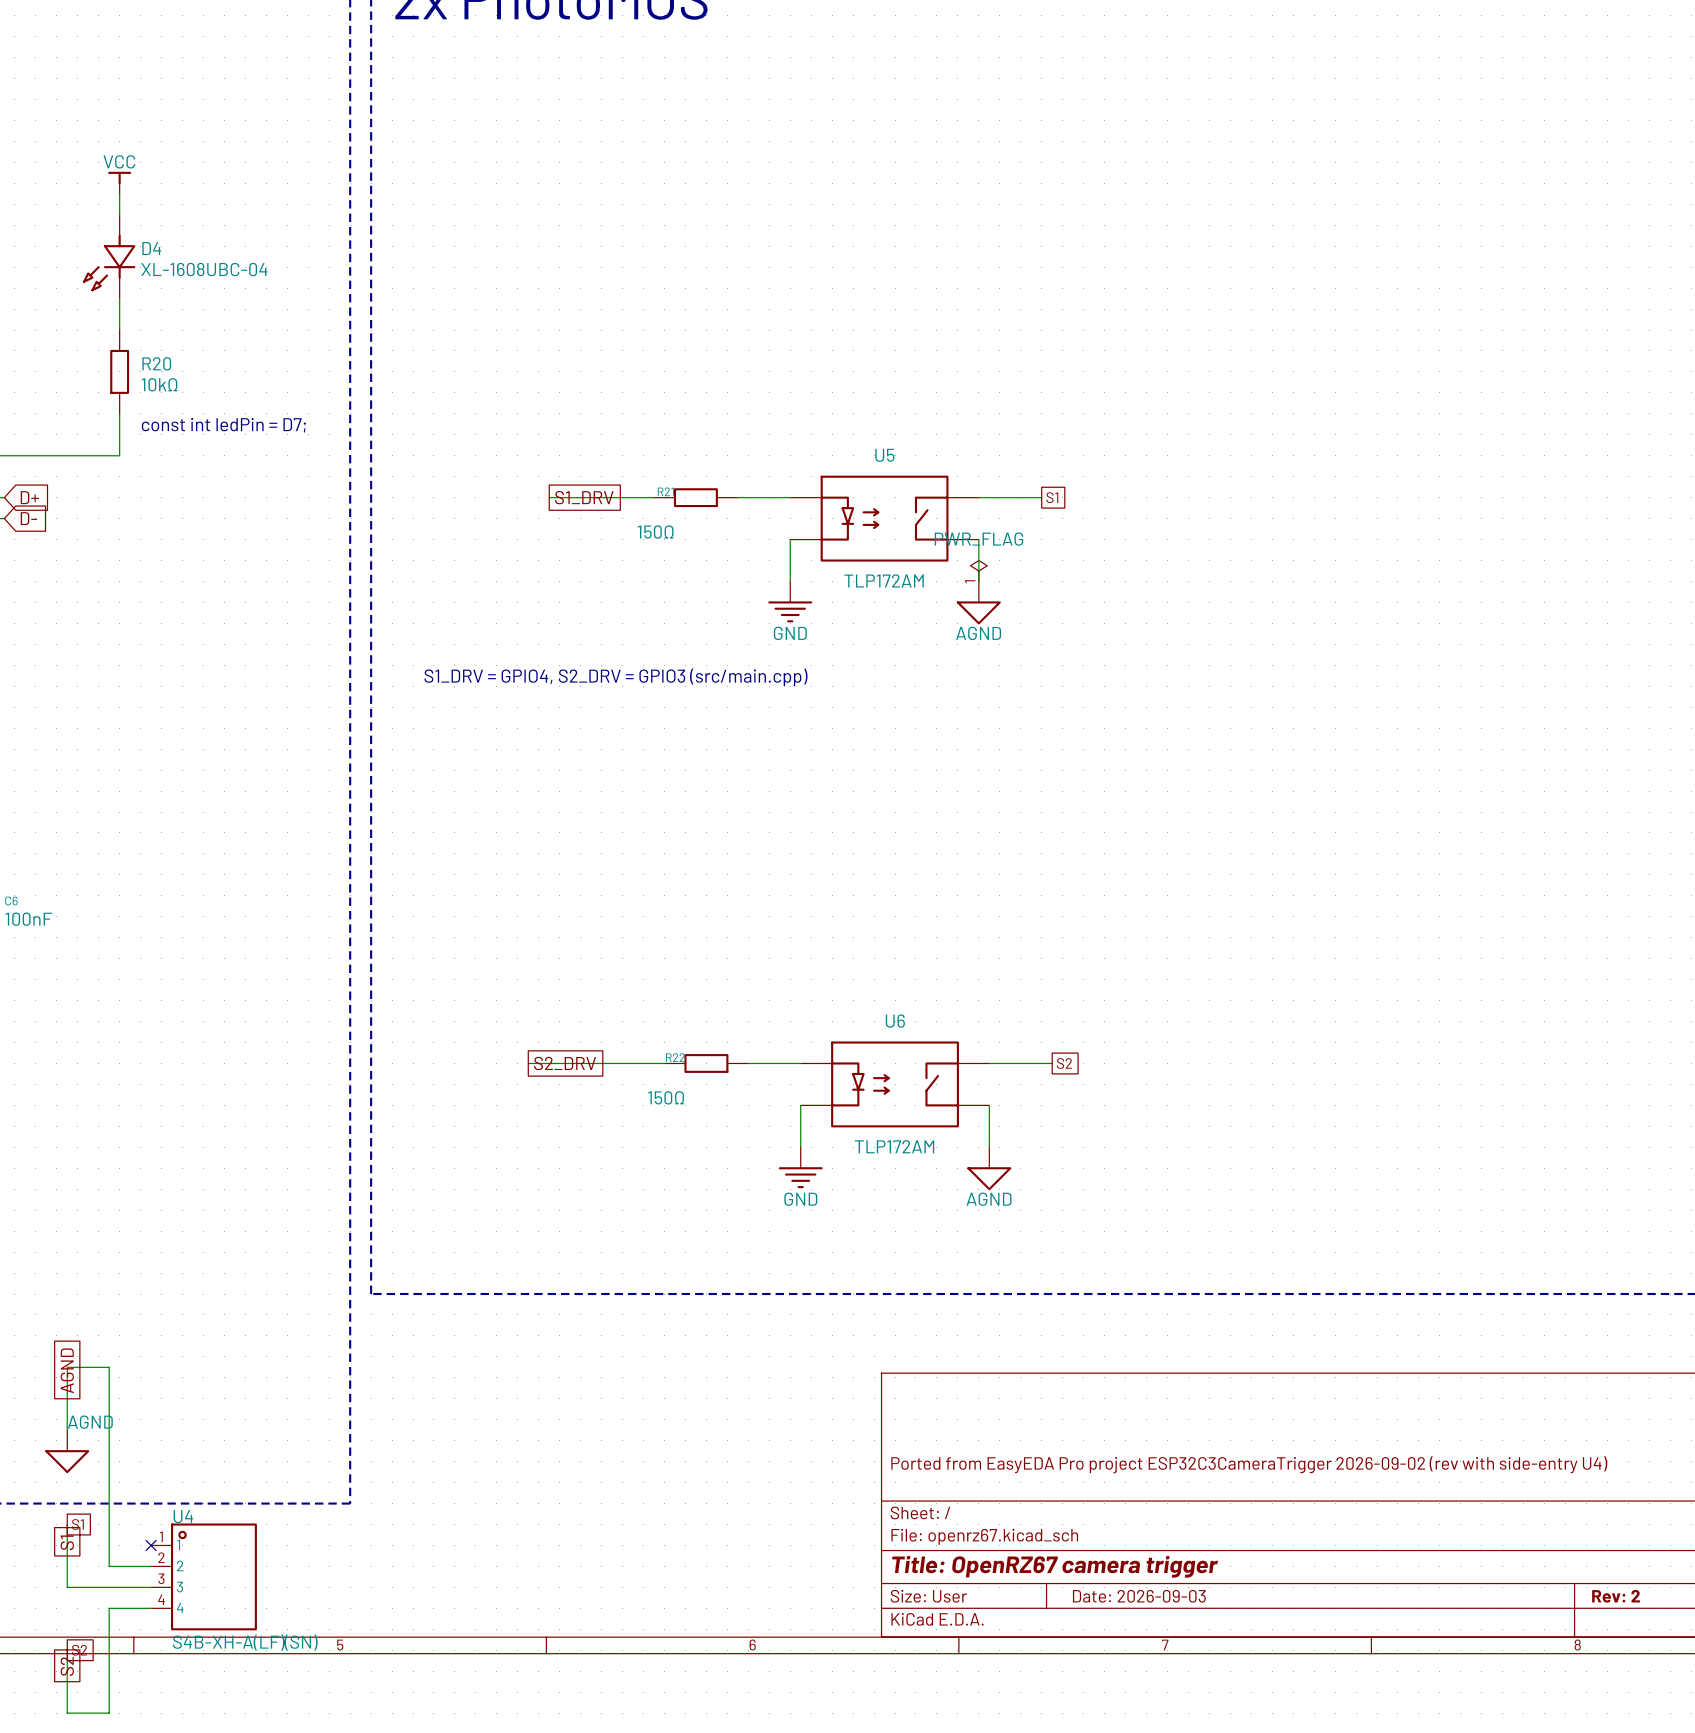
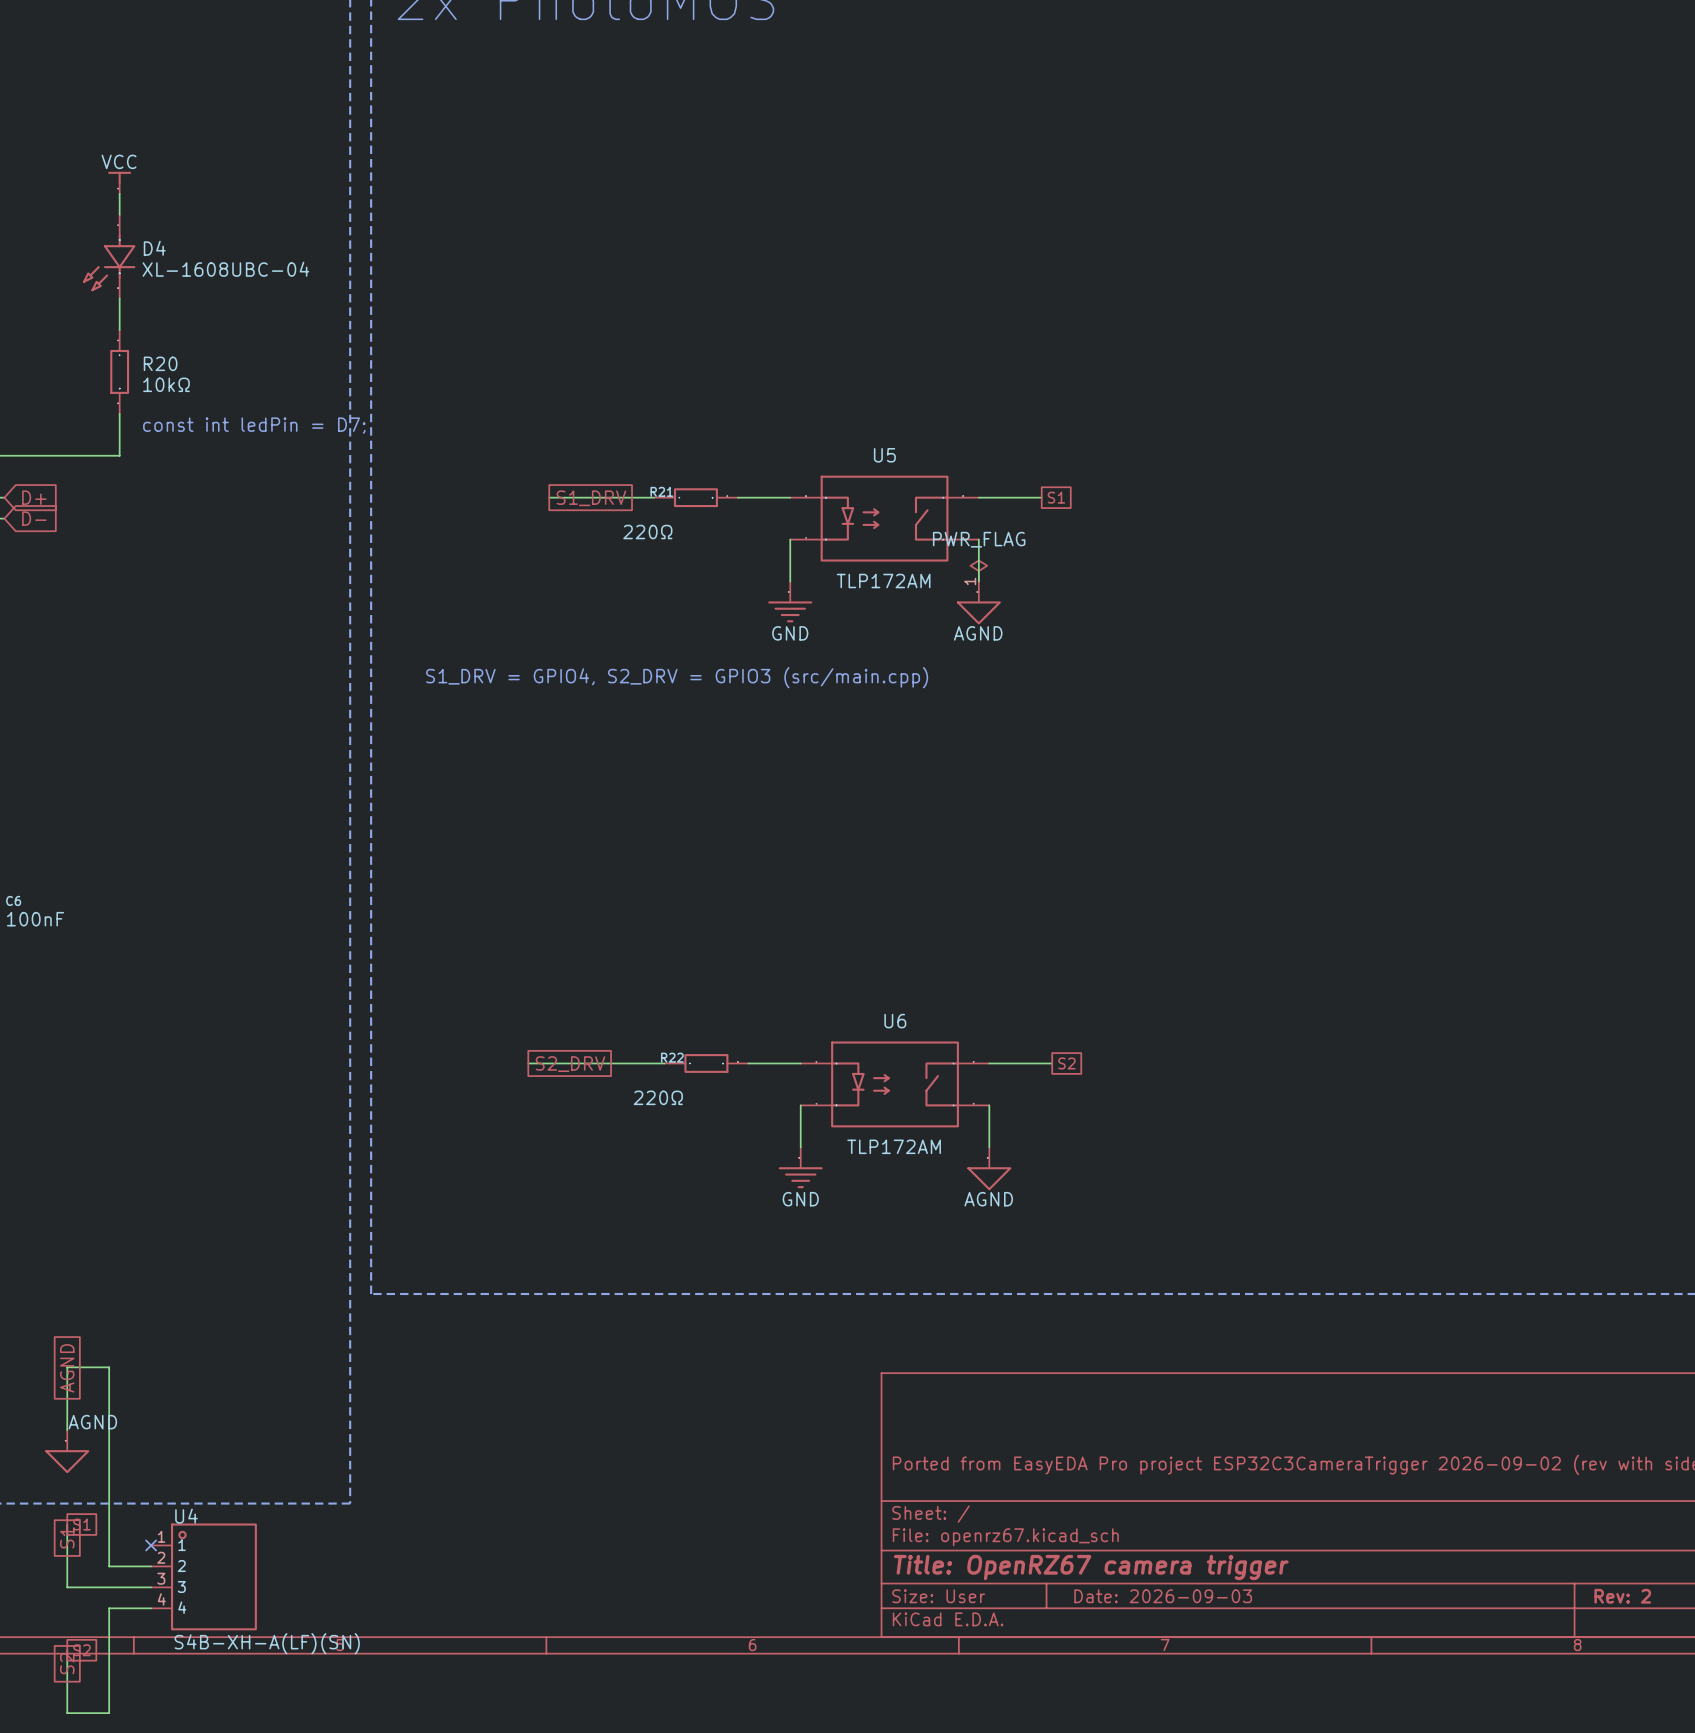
R21 value: 150Ω (655, 532) -> 220Ω (647, 532)
R22 value: 150Ω (666, 1097) -> 220Ω (658, 1097)

